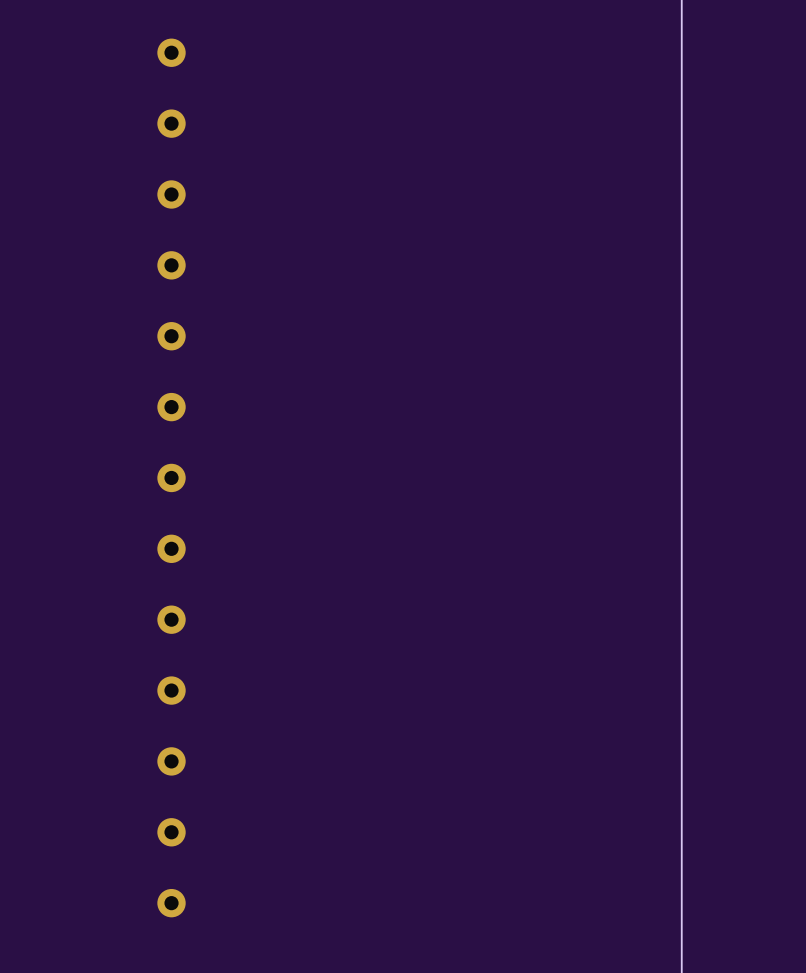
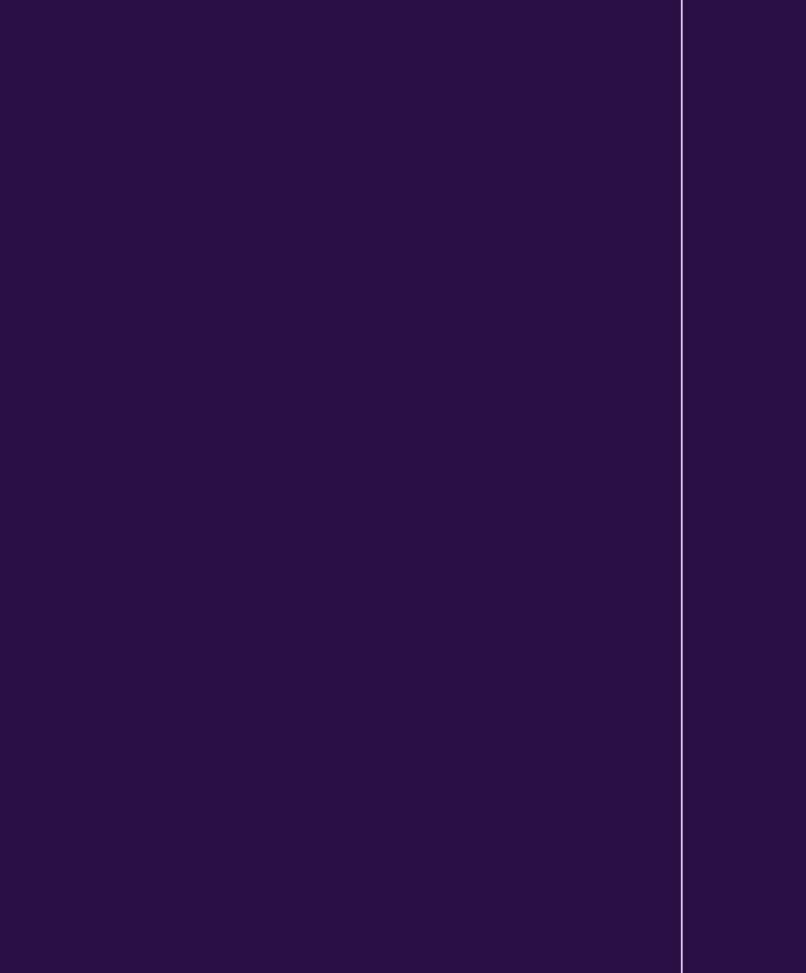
via: (171, 52) -> none
via: (171, 123) -> none
via: (171, 194) -> none
via: (171, 265) -> none
via: (171, 336) -> none
via: (171, 407) -> none
via: (171, 477) -> none
via: (171, 548) -> none
via: (171, 619) -> none
via: (171, 690) -> none
via: (171, 761) -> none
via: (171, 832) -> none
via: (171, 903) -> none

